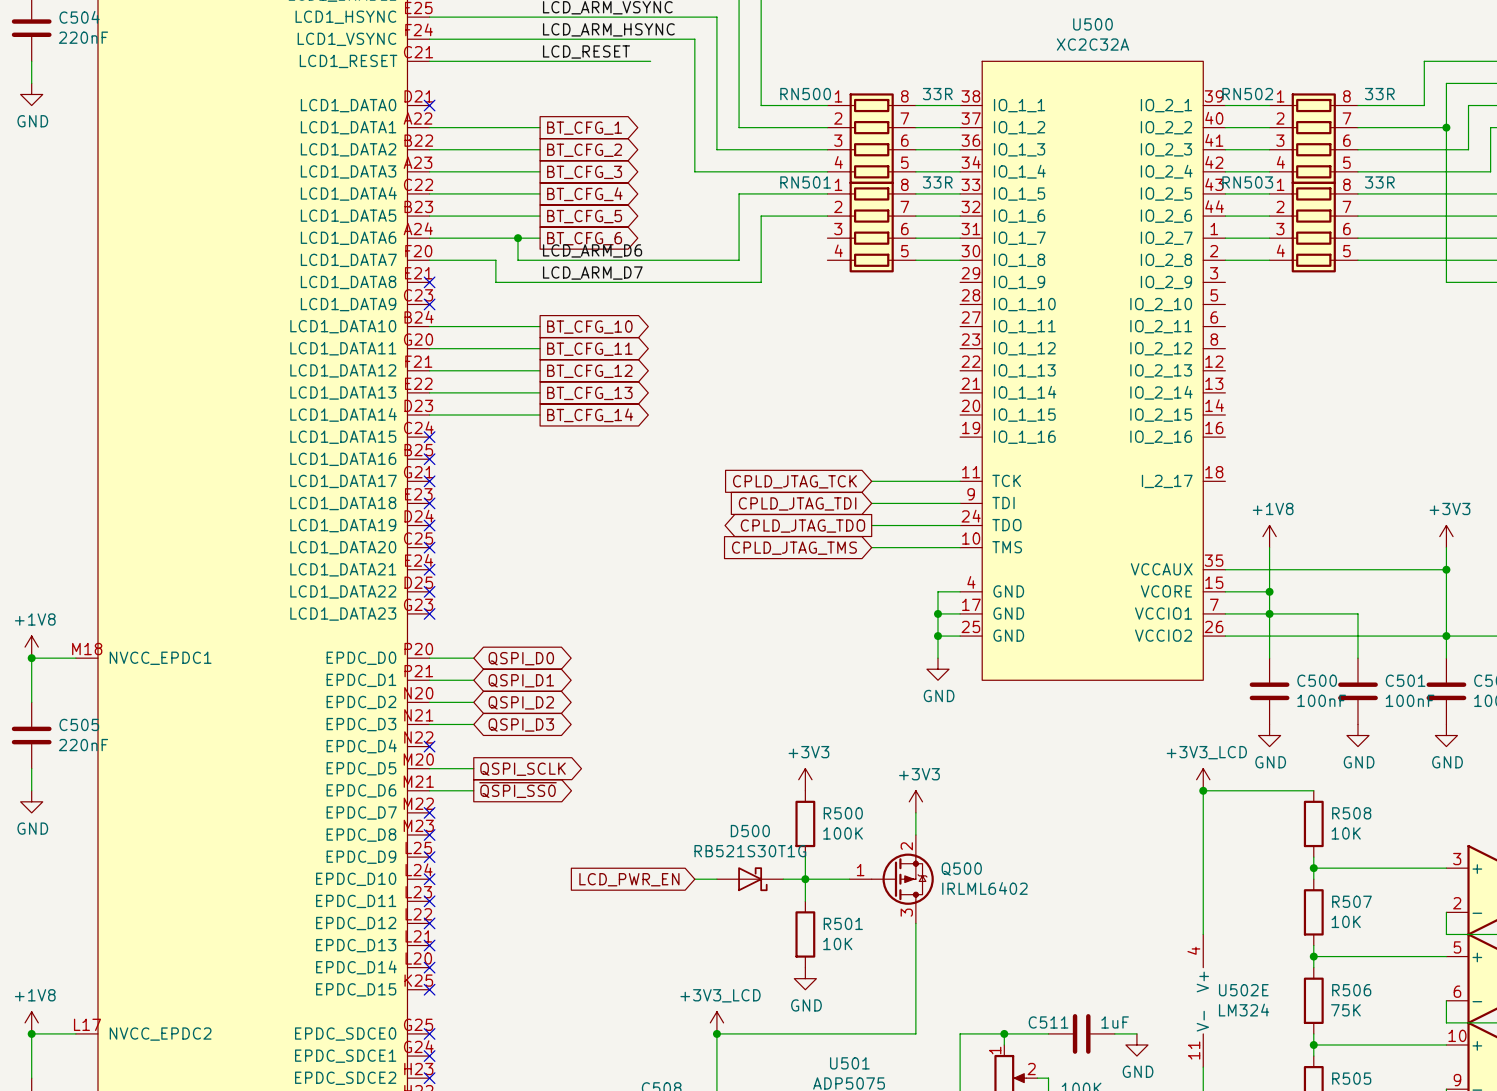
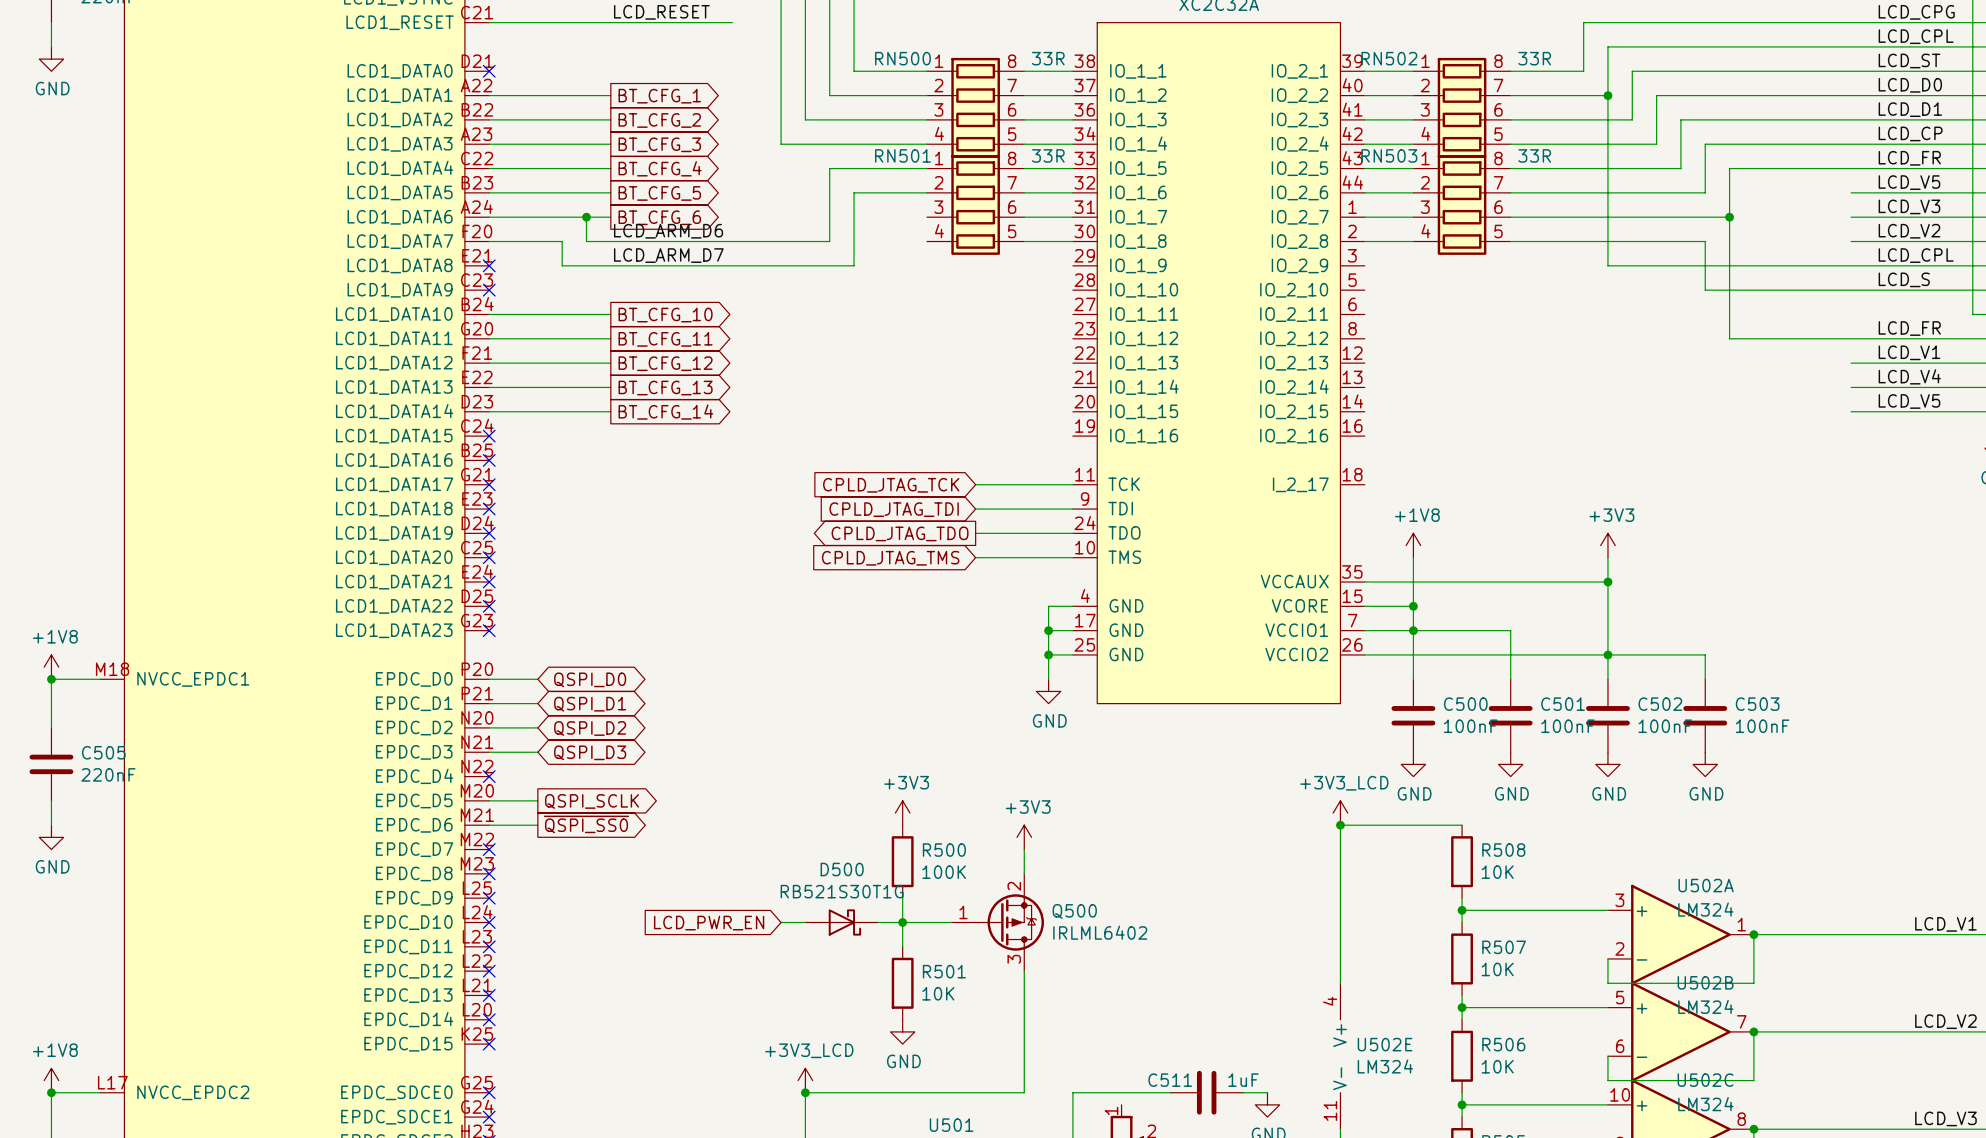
R506 value: 75K (1345, 1010) -> 10K (1497, 1066)
wire: (1004, 1033) (1004, 1044) -> none
junction: (1004, 1033) -> none

